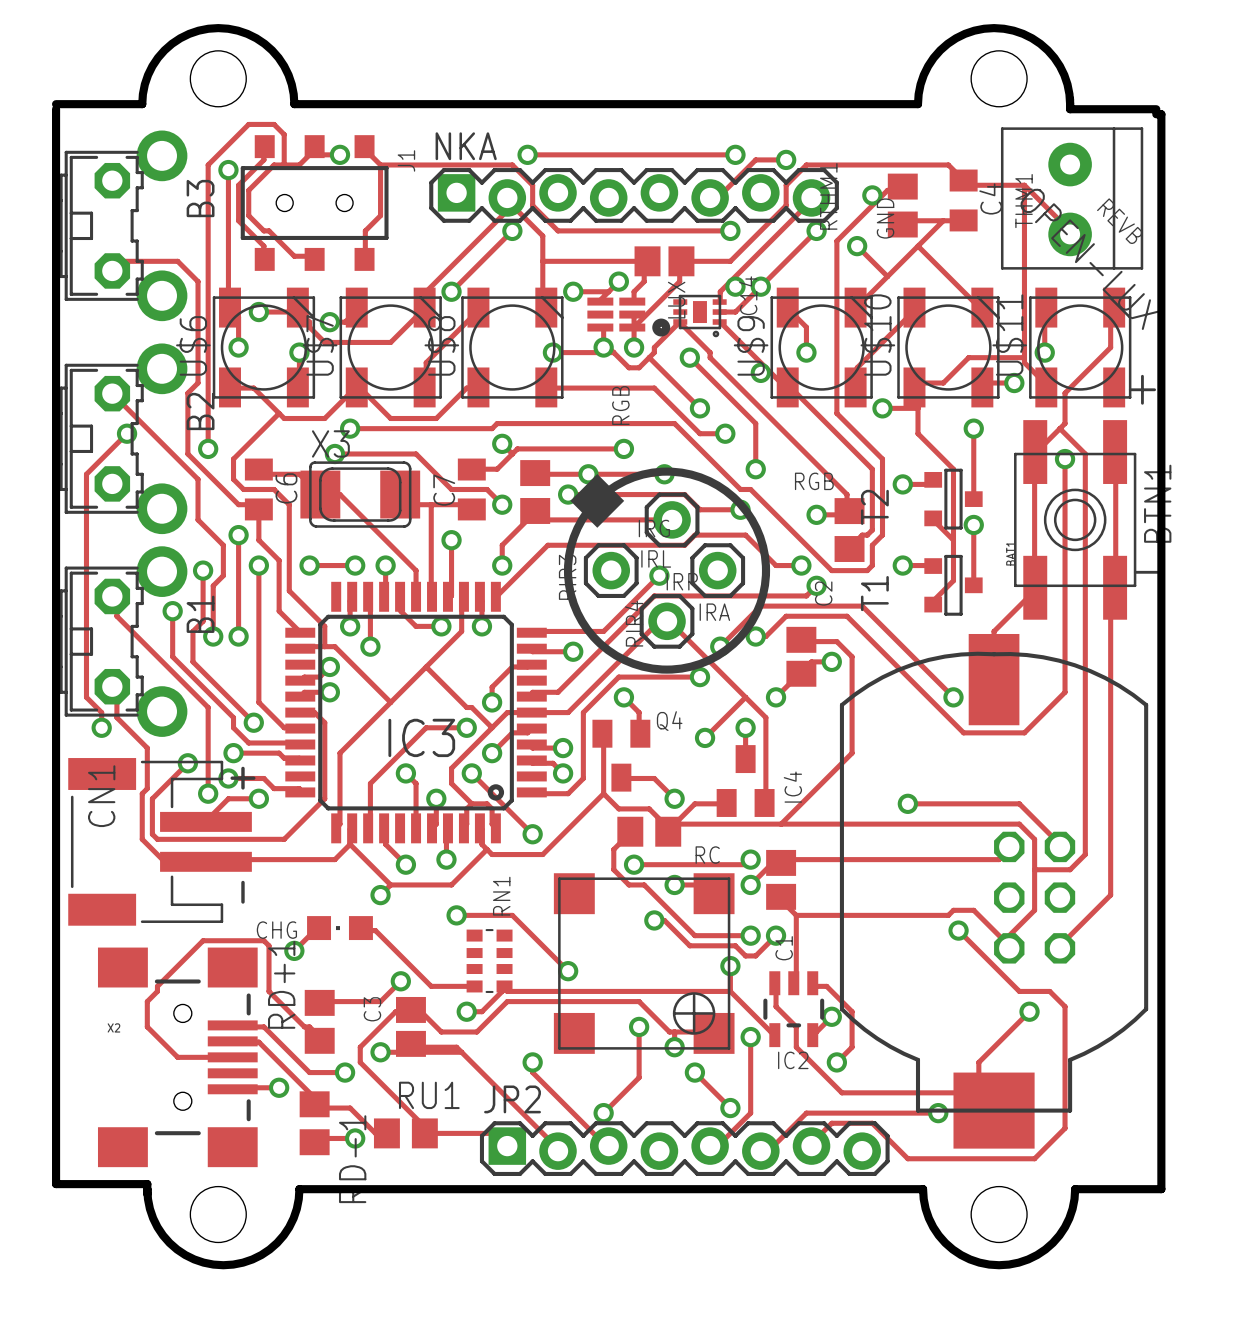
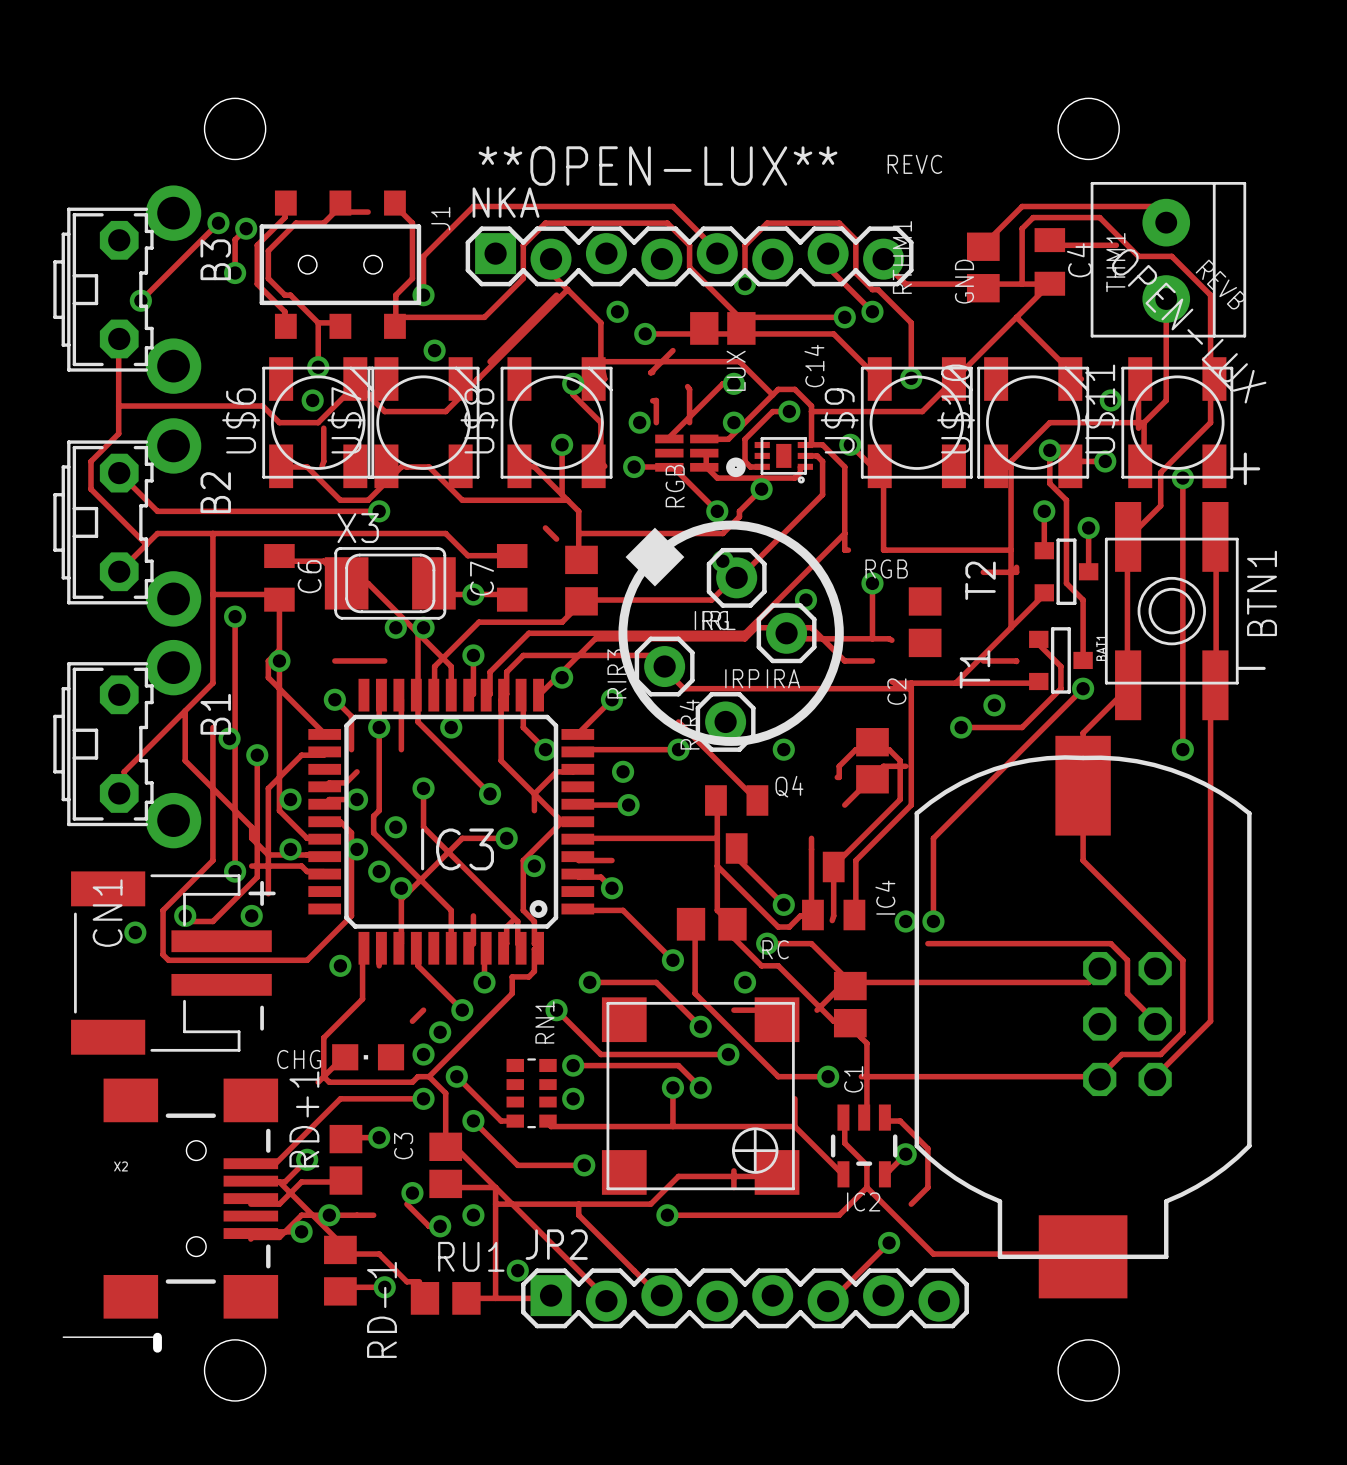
board edge: (1070, 99) (1070, 109) (1156, 109) -> none
board edge: (56, 104) (142, 104) (148, 75) (164, 50) (189, 33) (218, 28) (247, 33) (272, 50) (288, 75) (294, 104) (917, 104) (923, 75) (940, 50) (956, 38) (974, 30) (1003, 28) (1032, 38) (1047, 50) (1064, 75) (1070, 104) -> none
board edge: (56, 109) (56, 1184) (61, 1184) -> none
text: none -> REVC (914, 164)
text: none -> **OPEN-LUX** (657, 166)
board edge: (1156, 114) (1161, 114) (1161, 1189) (1075, 1189) (1069, 1218) (1052, 1242) (1028, 1259) (999, 1265) (970, 1259) (945, 1242) (928, 1218) (923, 1189) (299, 1189) (293, 1218) (277, 1242) (261, 1255) (243, 1262) (213, 1264) (185, 1255) (169, 1242) (153, 1218) (147, 1189) -> none
via: (339, 154) -> none
track: (527, 154) (735, 154) -> none
via: (527, 154) -> none
via: (735, 154) -> none
track: (786, 159) (755, 159) (720, 195) (710, 195) (710, 197) -> none
via: (786, 159) -> none
track: none -> (218, 223) (140, 300)
via: none -> (218, 223)
track: (284, 164) (284, 134) (274, 124) (248, 124) (208, 164) (208, 448) -> none
track: (380, 164) (502, 164) -> (394, 326) (395, 317) (484, 317) (523, 278) (523, 245) (545, 223)
track: (512, 164) (532, 185) (532, 205) (558, 230) (730, 230) -> (556, 223) (667, 223) (689, 245) (689, 267) (739, 317) (844, 317)
track: none -> (1166, 222) (1166, 217) (1155, 206) (1022, 206) (983, 246)
track: (228, 170) (228, 306) (238, 317) (238, 347) -> (246, 228) (235, 239) (235, 273)
track: (963, 180) (948, 164) (806, 164) (786, 185) -> (745, 284) (745, 245) (767, 223) (839, 223) (855, 239) (855, 245)
track: (902, 186) (902, 190) (887, 190) (836, 241) (836, 256) -> (855, 267) (855, 273) (872, 289) (878, 289) (911, 322)
track: none -> (717, 253) (717, 250) (672, 206) (473, 206) (423, 256) (423, 295)
track: none -> (828, 253) (828, 267) (872, 311)
via: (872, 195) -> none
track: (507, 197) (512, 205) (426, 291) (426, 306) (390, 342) (324, 342) (309, 327) (309, 322) (299, 312) (297, 307) (294, 312) (258, 312) -> none
track: (507, 200) (542, 235) (542, 306) (546, 307) -> (551, 261) (551, 273) (600, 322) (600, 378) (604, 379) (600, 361) (623, 361)
track: (811, 200) (720, 291) (719, 302) -> (883, 261) (905, 284) (983, 284)
track: (786, 205) (730, 261) (679, 261) (679, 281) (632, 327) -> none
via: none -> (235, 273)
via: none -> (745, 284)
track: none -> (1022, 284) (1022, 228) (1033, 217) (1099, 217) (1138, 256) (1171, 256) (1210, 295) (1210, 378) (1214, 379)
track: (943, 220) (855, 307) -> none
track: none -> (1049, 284) (922, 411) (811, 411)
track: none -> (567, 289) (445, 411) (384, 411) (357, 383)
via: none -> (423, 295)
via: (512, 230) -> none
via: (730, 230) -> none
track: (816, 230) (735, 312) (719, 312) -> none
via position: (816, 230) -> (872, 311)
track: (1070, 234) (1070, 230) (1024, 185) (1024, 362) (1044, 383) (1046, 387) -> (1166, 299) (1166, 400) (1144, 422)
via: none -> (140, 300)
via: none -> (617, 311)
track: (857, 246) (887, 276) -> none
via: (857, 246) -> none
track: (917, 246) (978, 306) (982, 307) -> none
via: none -> (844, 317)
track: none -> (1016, 317) (1077, 378) (1081, 379)
track: none -> (318, 322) (318, 367)
track: (542, 261) (647, 261) -> none
track: (644, 261) (644, 281) (634, 291) (634, 301) (632, 301) -> none
track: none -> (645, 333) (833, 333) (879, 379)
via: none -> (645, 333)
track: (112, 270) (121, 261) (177, 261) (198, 281) (198, 383) (187, 393) (187, 453) (238, 504) -> (119, 338) (118, 433) (90, 461) (90, 489) (146, 544)
via: none -> (434, 350)
via: (618, 281) -> none
via: (735, 286) -> none
via: (760, 286) -> none
via: (451, 291) -> none
via: (573, 291) -> none
track: none -> (661, 361) (739, 361) (772, 394)
via: none -> (318, 367)
track: (836, 306) (836, 413) (882, 459) (882, 535) (872, 545) (872, 565) (867, 570) (831, 570) (750, 489) (740, 489) (674, 423) (497, 423) (492, 428) (355, 428) -> none
via: none -> (911, 378)
track: (478, 307) (476, 312) (426, 362) (424, 387) -> none
track: (787, 307) (806, 327) (806, 352) -> none
track: (914, 307) (912, 312) (857, 367) (855, 387) -> none
via: (258, 312) -> none
track: none -> (357, 383) (318, 422) (279, 422) (262, 406) (118, 406)
track: none -> (573, 383) (573, 394) (600, 422) (600, 461) (604, 466)
via: none -> (573, 383)
track: none -> (733, 383) (722, 383) (667, 439) (669, 438)
via: none -> (733, 383)
part position: (699, 316) -> (783, 460)
part position: (628, 317) -> (700, 455)
via: (329, 322) -> none
track: (679, 322) (654, 347) (654, 352) (639, 367) (628, 367) (603, 342) -> none
track: (679, 322) (710, 352) (710, 357) (847, 494) (847, 509) (849, 511) (847, 514) (816, 514) -> none
track: (719, 322) (786, 388) (791, 388) (872, 469) (872, 530) (867, 535) (862, 535) (849, 549) -> none
via: none -> (312, 400)
via: none -> (1110, 400)
track: none -> (789, 411) (772, 411) (745, 439) (745, 461) (750, 467) (762, 466)
via: none -> (789, 411)
via: (238, 347) -> none
U$6 position: (263, 347) -> (318, 422)
via position: (603, 347) -> (639, 422)
via: (634, 347) -> none
U$9 position: (821, 347) -> (916, 422)
track: none -> (1144, 422) (1144, 461) (1140, 466)
track: none -> (1144, 422) (1049, 422) (1007, 466) (1011, 467) (1011, 627)
via: (299, 352) -> none
track: (552, 352) (613, 352) -> none
via: (552, 352) -> none
via: (806, 352) -> none
via: (1044, 352) -> none
track: (649, 357) (699, 408) -> none
track: (689, 357) (755, 423) (755, 469) -> none
via position: (689, 357) -> (733, 422)
track: (1024, 357) (968, 357) (943, 383) (917, 383) (914, 387) (917, 388) (917, 433) (953, 469) (953, 545) -> none
track: none -> (704, 438) (728, 439) (778, 389) (794, 389) (811, 406) (811, 444) (805, 445) (822, 444) (844, 467) (844, 550) (848, 550)
track: none -> (562, 444) (562, 494)
via: none -> (562, 444)
track: none -> (850, 444) (883, 478) (879, 466) (883, 467) (883, 550) (1011, 550)
via: none -> (850, 444)
via: (760, 372) -> none
track: none -> (1049, 450) (1049, 483) (1066, 500) (1066, 583) (1083, 600) (1083, 660)
via: none -> (1049, 450)
track: none -> (704, 453) (706, 455) (706, 467) (717, 478) (794, 478) (800, 472) (800, 467) (805, 466)
track: (230, 387) (253, 388) (284, 418) (314, 418) -> (281, 466) (307, 467) (340, 500)
track: (478, 387) (466, 388) (436, 418) -> (567, 500) (473, 500)
track: (546, 387) (583, 388) -> none
via: none -> (634, 467)
track: (613, 388) (654, 388) (699, 433) (725, 433) -> (667, 467) (672, 467) (717, 511)
track: none -> (761, 478) (761, 489) (739, 511) (739, 516) (722, 533) (678, 533)
via: none -> (1182, 478)
track: (882, 408) (917, 408) -> none
via: (882, 408) -> none
track: (279, 413) (233, 459) (233, 479) (243, 489) (274, 489) (289, 504) (289, 590) (324, 626) -> (334, 699) (351, 716) (351, 727)
track: (324, 418) (356, 387) (360, 388) (390, 418) (426, 418) -> (351, 500) (368, 500) (403, 466) (429, 467) (462, 500)
track: (147, 428) (198, 479) -> (212, 533) (212, 566)
track: none -> (157, 511) (379, 511)
via: none -> (717, 511)
track: none -> (1044, 511) (1044, 550)
track: (973, 428) (973, 499) -> none
via position: (973, 428) -> (1044, 511)
track: (1059, 428) (1085, 453) -> (1182, 478) (1182, 539)
track: (127, 433) (86, 474) (86, 697) (101, 712) (101, 727) -> none
via: (127, 433) -> none
via: (725, 433) -> none
via: (502, 443) -> none
track: none -> (1088, 527) (1088, 571)
via: none -> (1088, 527)
via: (208, 448) -> none
track: (532, 448) (517, 448) (497, 469) (471, 469) -> none
via: (623, 448) -> none
track: (334, 453) (416, 453) -> (119, 571) (157, 533) (445, 533) (451, 539)
via: (334, 453) -> none
track: (1065, 459) (1065, 692) (1024, 732) (963, 732) (847, 616) (786, 616) (765, 636) (755, 636) -> none
via: (1065, 459) -> none
track: (431, 469) (451, 489) (487, 489) (502, 504) -> (467, 555) (512, 555)
via: (755, 469) -> none
track: (535, 473) (664, 474) -> (581, 559) (578, 555) (578, 511) (534, 467) (530, 466)
via: (588, 474) -> none
via: (902, 484) -> none
track: (568, 494) (684, 494) (699, 509) (740, 509) -> none
via: (568, 494) -> none
track: none -> (872, 583) (872, 638)
T2 position: (953, 499) -> (1066, 571)
drawing position: (597, 500) -> (654, 557)
track: none -> (1044, 592) (955, 683)
track: none -> (212, 594) (257, 594)
track: (431, 504) (432, 596) -> (473, 655) (473, 694) (468, 695)
via: none -> (473, 594)
via: (502, 504) -> none
track: (535, 510) (527, 519) (672, 519) -> (581, 601) (711, 600) (733, 577) (739, 577) (822, 494) (822, 461) (817, 455) (805, 455)
via position: (816, 514) -> (872, 583)
track: (933, 518) (953, 540) -> none
track: (198, 519) (223, 545) (223, 575) (213, 585) (213, 636) -> (212, 611) (212, 683) (124, 771) (124, 788) (119, 793)
IRL position: (672, 519) -> (736, 577)
track: none -> (235, 616) (235, 871)
track: (973, 524) (973, 570) -> (1038, 644) (1060, 666)
via: (973, 524) -> none
track: (517, 530) (502, 545) (502, 565) -> (562, 622) (478, 622) (434, 666) (433, 695)
track: (238, 535) (238, 636) -> none
via position: (238, 535) -> (235, 616)
via: none -> (395, 627)
track: none -> (423, 627) (418, 633) (418, 660)
via: none -> (423, 627)
track: (258, 540) (279, 560) (279, 611) -> (279, 633) (279, 649) (268, 660) (268, 677) (301, 710)
track: (451, 540) (451, 575) -> (844, 533) (745, 633) (528, 633) (490, 672)
via: (451, 540) -> none
track: none -> (786, 633) (789, 633) (794, 638) (891, 640)
track: (953, 550) (953, 580) (933, 601) (933, 604) -> none
via: none -> (473, 655)
via: (309, 565) -> none
via: (355, 565) -> none
via: (385, 565) -> none
via position: (502, 565) -> (562, 677)
via: (801, 565) -> none
via: (902, 565) -> none
track: (203, 570) (203, 621) (192, 631) (192, 661) (253, 722) -> none
via: (203, 570) -> none
drawing position: (667, 570) -> (731, 633)
IRA position: (717, 570) -> (786, 633)
track: (659, 575) (603, 631) (532, 631) -> (611, 699) (578, 733)
via: (659, 575) -> none
track: none -> (1038, 681) (1038, 683) (891, 681)
track: (816, 585) (806, 595) (654, 595) (558, 692) (532, 692) (531, 696) -> (628, 805) (577, 804)
via: (816, 585) -> none
track: none -> (911, 683) (911, 805) (855, 860) (854, 915)
T1 position: (953, 585) -> (1060, 660)
track: none -> (1060, 682) (1060, 688) (1022, 727) (961, 727)
track: none -> (911, 688) (684, 688) (650, 655) (523, 655) (506, 672) (506, 694) (503, 695)
track: none -> (1083, 688) (933, 838) (933, 921)
via: none -> (1083, 688)
track: (112, 596) (116, 601) (116, 616) (208, 707) (208, 793) -> none
track: none -> (416, 695) (418, 721) (490, 794)
track: (400, 596) (400, 611) (416, 626) (441, 626) -> none
via: none -> (334, 699)
via: none -> (611, 699)
via: none -> (994, 705)
via: (172, 611) -> none
track: none -> (678, 721) (757, 800)
via: none -> (451, 727)
via: (441, 626) -> none
track: none -> (523, 727) (545, 749)
via: (481, 626) -> none
via: none -> (961, 727)
track: (461, 631) (339, 753) (339, 824) (336, 828) -> (429, 1076) (418, 1076) (412, 1082) (329, 1082) (323, 1076) (323, 1037) (362, 999) (363, 948)
via position: (238, 636) -> (257, 755)
via: (755, 636) -> none
track: (801, 639) (801, 641) (836, 641) (852, 656) (852, 753) (781, 824) -> none
via: (370, 646) -> none
via: none -> (545, 749)
via: none -> (678, 749)
track: (720, 646) (760, 606) (862, 606) (953, 697) -> none
track: (1085, 646) (1085, 839) -> (1083, 785) (1083, 860) (1182, 960)
via: none -> (1182, 749)
track: (300, 648) (304, 646) (334, 646) (390, 702) -> (324, 751) (323, 755) (301, 755) (268, 788) (268, 893)
track: (531, 648) (532, 651) (573, 651) -> (577, 751) (578, 749) (678, 749)
track: none -> (257, 755) (257, 877) (212, 921) (190, 921) (185, 915)
via position: (573, 651) -> (623, 771)
via: (831, 661) -> none
via: (329, 666) -> none
track: (426, 666) (466, 707) (471, 707) (492, 727) -> none
track: (699, 677) (618, 677) (583, 712) (583, 778) (568, 793) -> (672, 960) (623, 910) (617, 910)
via: (699, 677) -> none
via: none -> (423, 788)
track: (112, 686) (116, 687) (116, 717) (147, 748) (147, 788) (142, 793) (142, 839) (162, 859) (203, 859) (205, 861) (208, 859) (334, 859) (350, 844) (390, 884) (451, 884) (487, 849) -> none
via: none -> (490, 794)
via: none -> (290, 799)
track: none -> (715, 800) (717, 910) (732, 924) (733, 938) (761, 965) (778, 965) (833, 1021) (850, 1021) (850, 1023)
via: none -> (628, 805)
track: (623, 697) (639, 712) (640, 733) -> none
via: (623, 697) -> none
track: (745, 697) (705, 737) -> none
via: (776, 697) -> none
via: (953, 697) -> none
via: (492, 702) -> none
track: (517, 712) (507, 712) (451, 768) (451, 783) (471, 803) (487, 803) (492, 808) -> (501, 733) (501, 760) (562, 821) (523, 860) (523, 910) (534, 921) (534, 927)
track: (531, 712) (568, 712) (659, 621) (669, 621) (765, 717) (765, 753) -> (837, 777) (839, 777) (839, 766) (855, 749) (889, 749) (900, 760) (900, 799) (833, 866)
via: none -> (395, 827)
via: (253, 722) -> none
via: (101, 727) -> none
via: (745, 727) -> none
track: (531, 728) (527, 732) (512, 732) (492, 753) -> (577, 839) (717, 838)
track: (602, 733) (603, 793) -> none
via: none -> (290, 849)
via: none -> (357, 849)
track: none -> (736, 848) (739, 849) (739, 860) (783, 904)
via: (705, 737) -> none
via: (563, 748) -> none
via: (233, 753) -> none
track: none -> (717, 866) (778, 927) (789, 927) (800, 915) (812, 915) (811, 872)
Q4 position: (621, 755) -> (736, 824)
via: none -> (235, 871)
via: none -> (379, 871)
track: (187, 763) (152, 798) -> (212, 727) (212, 860) (163, 910) (163, 915)
via: (187, 763) -> none
via: none -> (401, 888)
track: (405, 773) (416, 783) (416, 793) -> (379, 738) (379, 810) (373, 816) (373, 832) (451, 910)
via: (405, 773) -> none
track: (471, 773) (532, 834) -> none
via: (471, 773) -> none
track: (621, 777) (654, 778) (674, 798) -> none
track: (228, 778) (263, 778) (274, 788) (299, 788) (300, 792) -> none
via: (228, 778) -> none
IC4 position: (745, 781) -> (833, 891)
via: none -> (783, 904)
via: (208, 793) -> none
track: (603, 793) (542, 854) (492, 854) (481, 844) (481, 829) (479, 828) -> (423, 788) (423, 827) (517, 921) (517, 943) (521, 948)
track: (603, 793) (618, 808) (649, 808) (669, 829) -> none
via: none -> (185, 915)
via: none -> (251, 915)
track: (258, 798) (228, 798) (205, 821) -> none
via: (258, 798) -> none
via: (436, 798) -> none
via: (674, 798) -> none
track: (726, 802) (694, 803) (669, 829) -> none
via: none -> (905, 921)
via: none -> (933, 921)
track: (907, 803) (1019, 803) (1059, 844) (1059, 846) -> none
via: (907, 803) -> none
via: none -> (135, 932)
track: (705, 824) (674, 824) (668, 831) (669, 829) -> none
via: none -> (767, 943)
track: (745, 824) (852, 824) -> (811, 943) (850, 982)
track: none -> (538, 948) (534, 949) (534, 971) (528, 976) (512, 976) (512, 993) (429, 1076)
track: (630, 831) (613, 849) (613, 869) -> (589, 982) (656, 982) (667, 993)
RC position: (649, 831) -> (711, 924)
via: (532, 834) -> none
via: none -> (672, 960)
via: none -> (340, 965)
track: (1085, 854) (1070, 869) (1034, 869) (1034, 910) (1004, 940) (1009, 948) -> (1182, 976) (1182, 1032) (1160, 1054) (1121, 1054) (1099, 1076) (861, 1076)
via: none -> (589, 982)
via: none -> (745, 982)
track: (750, 859) (745, 864) (634, 864) -> none
via: (750, 859) -> none
track: none -> (440, 987) (462, 1010)
via: (405, 864) -> none
via: (634, 864) -> none
track: none -> (1127, 993) (1155, 1021) (1155, 1024)
via: none -> (462, 1010)
track: none -> (556, 1010) (600, 1054) (728, 1054)
via: none -> (556, 1010)
track: (628, 884) (644, 884) (694, 935) (750, 935) -> (684, 1010) (700, 1026)
via: (674, 884) -> none
via: (750, 884) -> none
via: (380, 895) -> none
via: none -> (700, 1026)
via: none -> (440, 1032)
track: (456, 915) (512, 915) (568, 971) -> none
via: (456, 915) -> none
track: (796, 915) (948, 915) (953, 910) (973, 910) (1009, 945) -> none
track: (654, 920) (664, 920) (689, 945) (715, 945) -> (691, 924) (695, 927) (695, 993) (778, 1076)
via: (654, 920) -> none
via: none -> (423, 1054)
via: none -> (728, 1054)
track: (360, 928) (365, 930) (375, 930) (431, 986) (461, 986) -> (456, 1076) (501, 1121)
track: (958, 930) (1019, 991) (1049, 991) (1065, 1006) (1065, 1128) (1034, 1158) (907, 1158) (872, 1123) (831, 1123) (811, 1143) (811, 1146) -> none
via: (958, 930) -> none
track: none -> (573, 1065) (678, 1065) (700, 1087)
via: none -> (573, 1065)
via: (750, 935) -> none
track: (776, 935) (755, 955) (745, 955) (735, 945) -> (828, 1076) (800, 1076)
via: (776, 935) -> none
track: none -> (429, 1076) (445, 1093) (445, 1146)
via: none -> (456, 1076)
via: none -> (828, 1076)
via: (294, 950) -> none
track: none -> (672, 1087) (672, 1126)
via: none -> (672, 1087)
via: none -> (700, 1087)
track: none -> (423, 1098) (340, 1098) (273, 1165)
via: none -> (573, 1098)
via: (730, 966) -> none
via: (568, 971) -> none
track: (400, 981) (380, 1001) (350, 1001) -> none
via position: (400, 981) -> (423, 1098)
track: none -> (473, 1121) (517, 1165) (584, 1165)
via: none -> (473, 1121)
track: (504, 986) (502, 991) (481, 1011) (466, 1011) -> none
via: none -> (379, 1137)
track: (410, 1011) (395, 1011) (360, 1047) (360, 1062) (431, 1133) -> none
via: (466, 1011) -> none
track: (1029, 1011) (978, 1062) (978, 1092) -> none
via: (1029, 1011) -> none
track: none -> (307, 1159) (284, 1181) (279, 1181)
via: none -> (307, 1159)
track: (253, 1026) (263, 1026) (309, 1072) -> (250, 1239) (251, 1237) (279, 1237) (301, 1215) (334, 1215)
via: none -> (584, 1165)
track: (639, 1026) (639, 1077) (603, 1113) -> none
via: (639, 1026) -> none
track: (441, 1032) (476, 1032) (507, 1001) (639, 1001) (669, 1032) (714, 1033) -> (495, 1204) (650, 1204) (678, 1176) (772, 1176) (777, 1172)
track: none -> (478, 1170) (495, 1187) (495, 1298)
track: (750, 1037) (750, 1113) (720, 1143) (710, 1143) (710, 1146) -> none
via: (750, 1037) -> none
track: (319, 1040) (319, 1037) (309, 1026) (304, 1026) (269, 991) (269, 945) (263, 940) (203, 940) (157, 986) (157, 991) (147, 1001) (147, 1026) (177, 1057) (232, 1057) -> (345, 1180) (301, 1181) (279, 1204) (250, 1204)
via: (674, 1047) -> none
track: none -> (866, 1187) (839, 1215) (667, 1215)
track: (380, 1052) (461, 1052) -> none
track: none -> (406, 1204) (429, 1226) (440, 1226)
via: (532, 1062) -> none
via position: (836, 1062) -> (889, 1242)
via: none -> (329, 1215)
via: (345, 1072) -> none
via: none -> (473, 1215)
via: none -> (667, 1215)
track: (694, 1072) (730, 1108) -> none
via: (694, 1072) -> none
via: none -> (440, 1226)
track: (841, 1092) (978, 1092) -> (916, 1237) (933, 1254) (1083, 1254)
track: none -> (889, 1242) (828, 1303) (828, 1306)
via: (730, 1108) -> none
via: (603, 1113) -> none
track: (938, 1113) (806, 1113) (770, 1148) (760, 1148) (760, 1151) -> none
via: (938, 1113) -> none
via: none -> (517, 1270)
RU1 position: (405, 1133) -> (445, 1298)
track: (424, 1133) (497, 1133) (507, 1143) (507, 1146) -> none
track: none -> (466, 1298) (551, 1298) (551, 1301)
board edge width: thick (61, 1184) (147, 1184) -> thin (63, 1337) (157, 1337)

